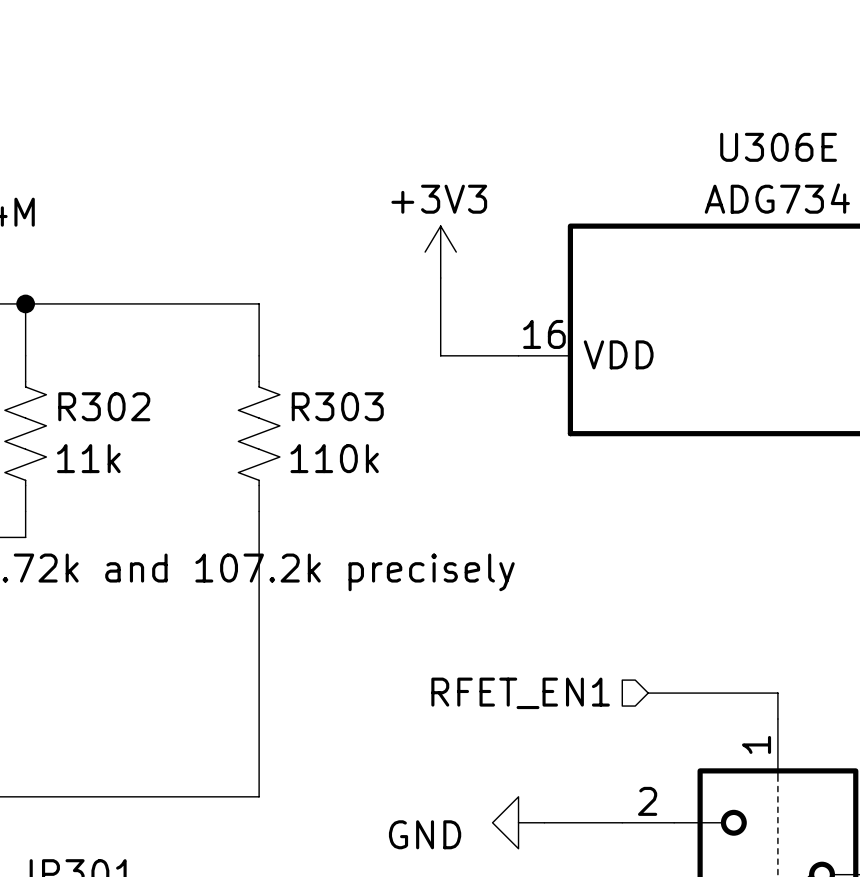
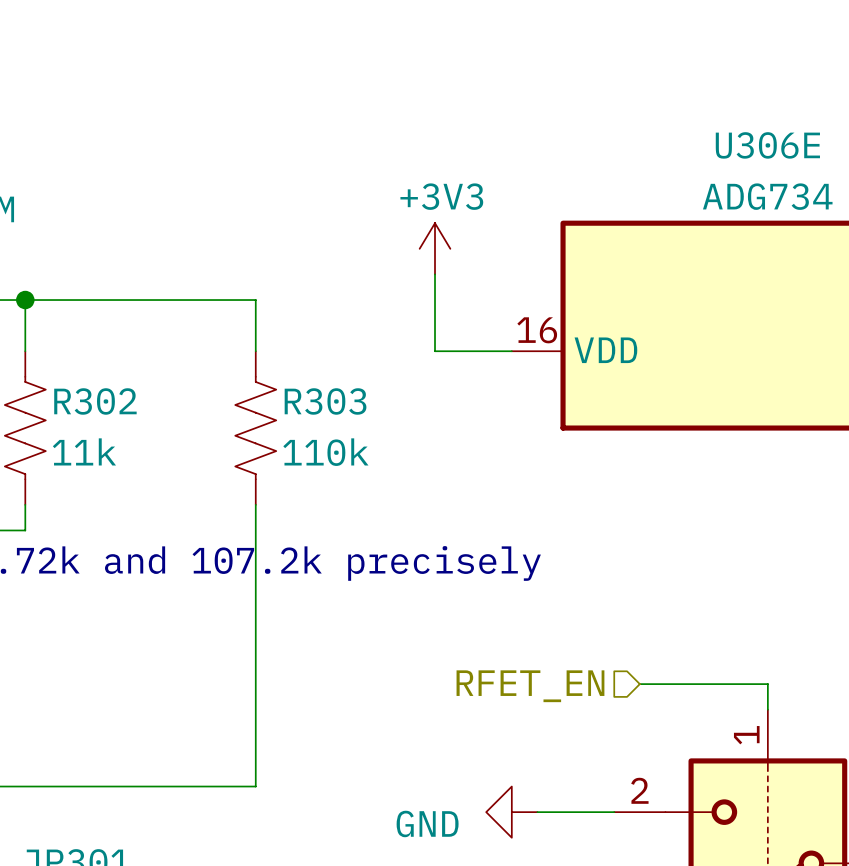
hierarchical label: RFET_EN1 (520, 693) -> RFET_EN (530, 686)

